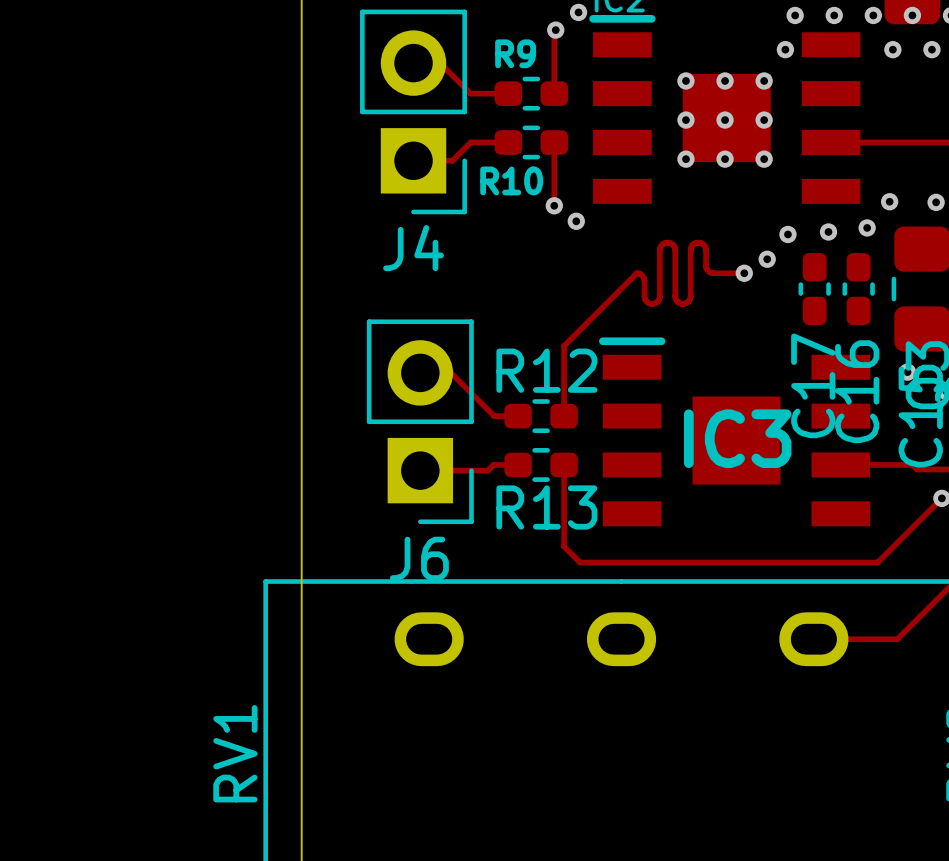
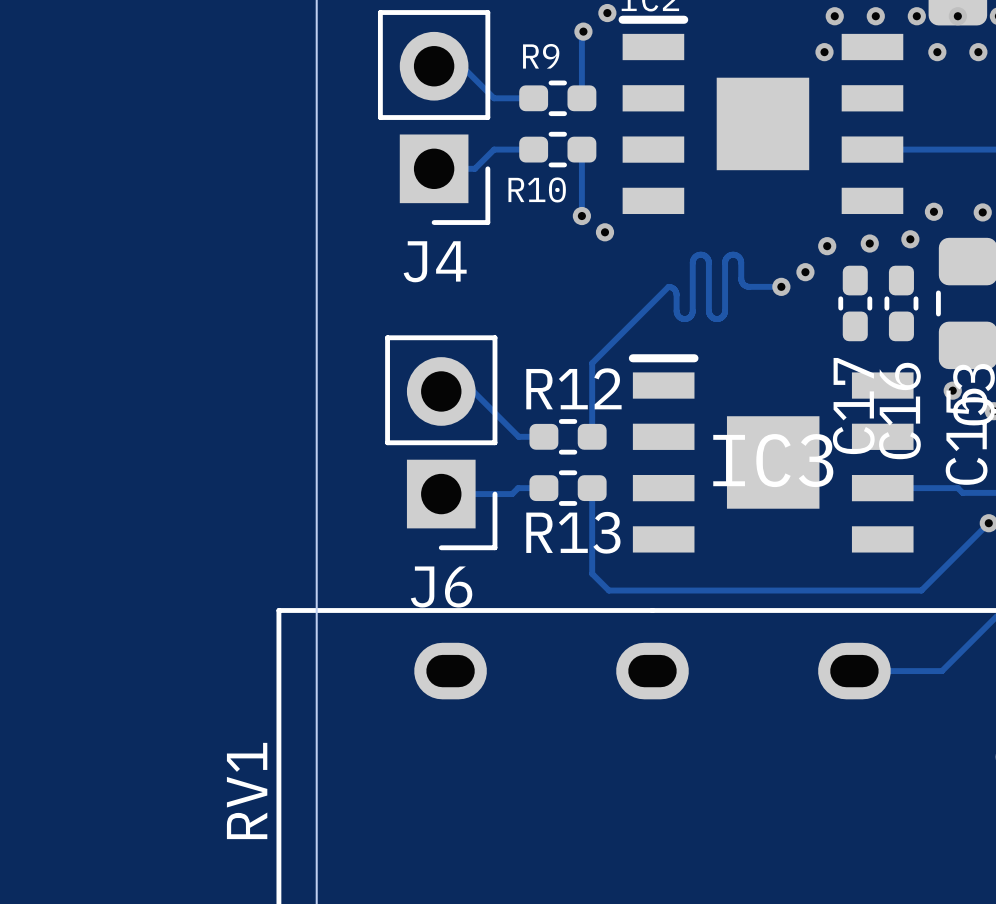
via: (685, 80) -> none
via: (725, 80) -> none
via: (764, 80) -> none
via: (685, 120) -> none
via: (725, 120) -> none
via: (764, 120) -> none
via: (685, 159) -> none
via: (725, 159) -> none
via: (764, 159) -> none

